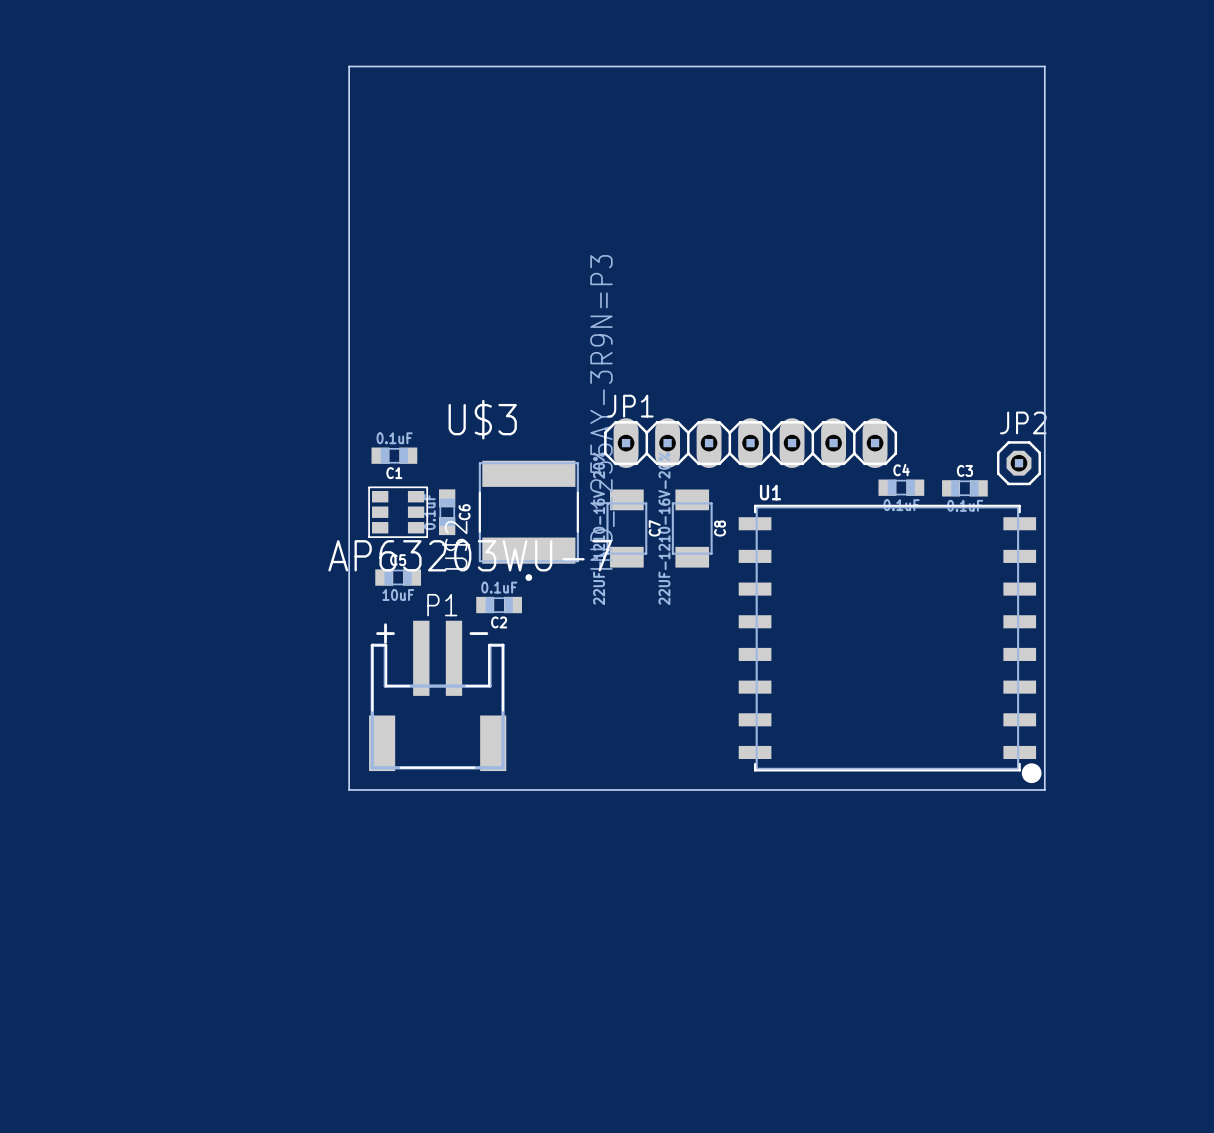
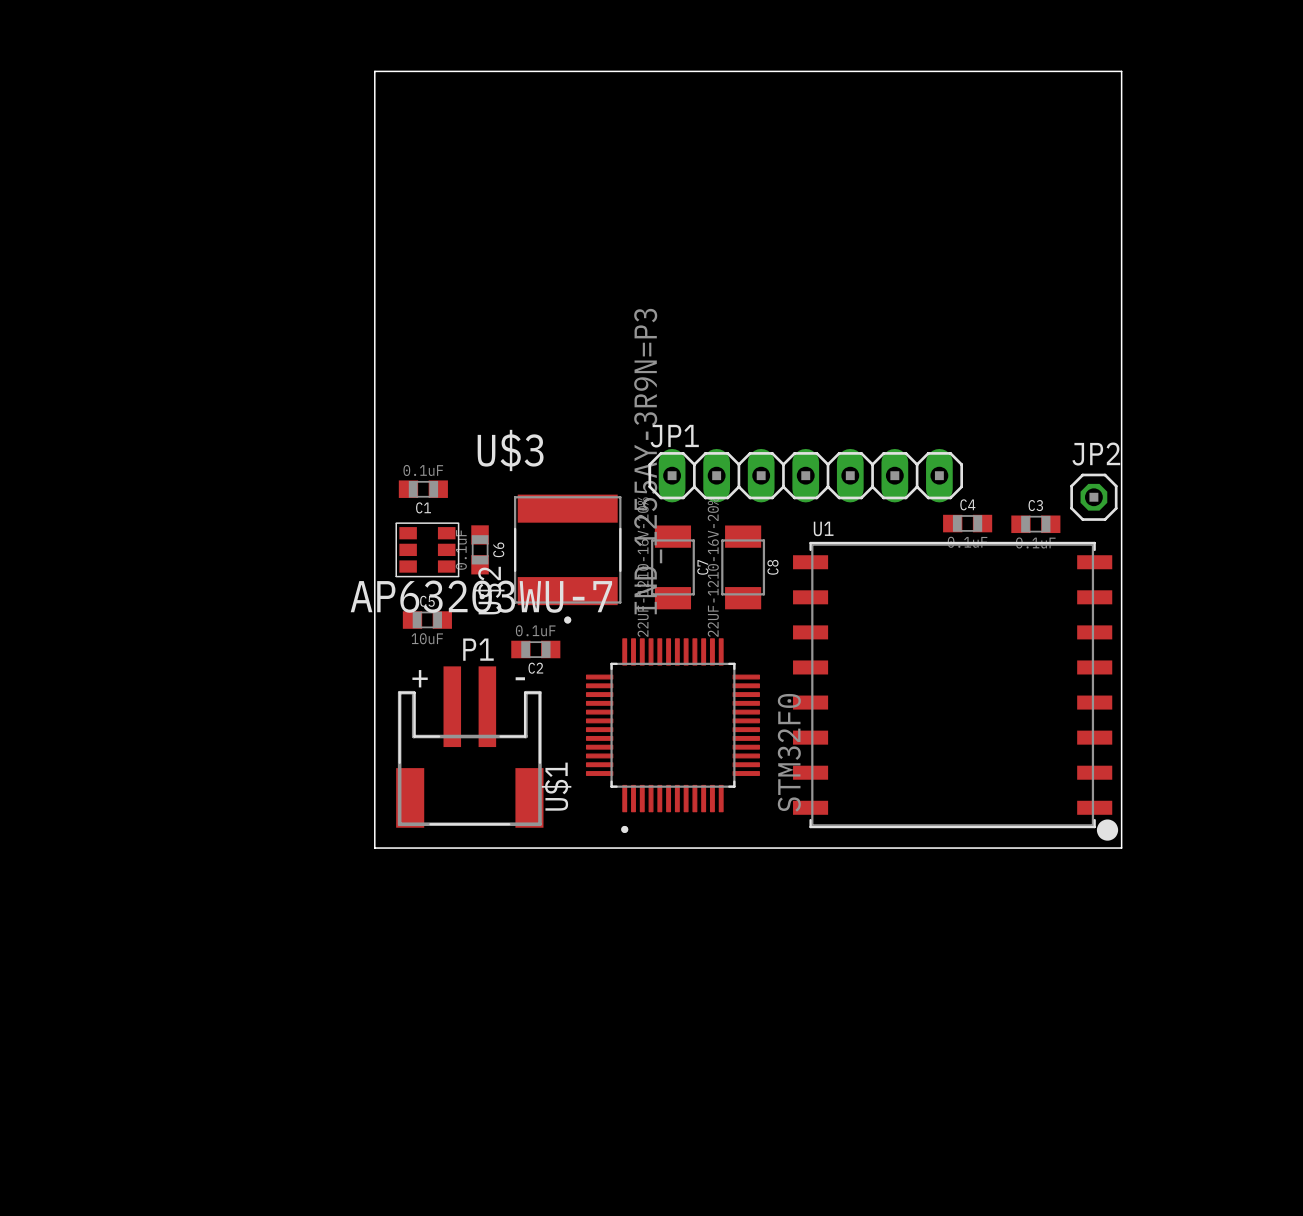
U$1: none -> STM32F0 (672, 735)

